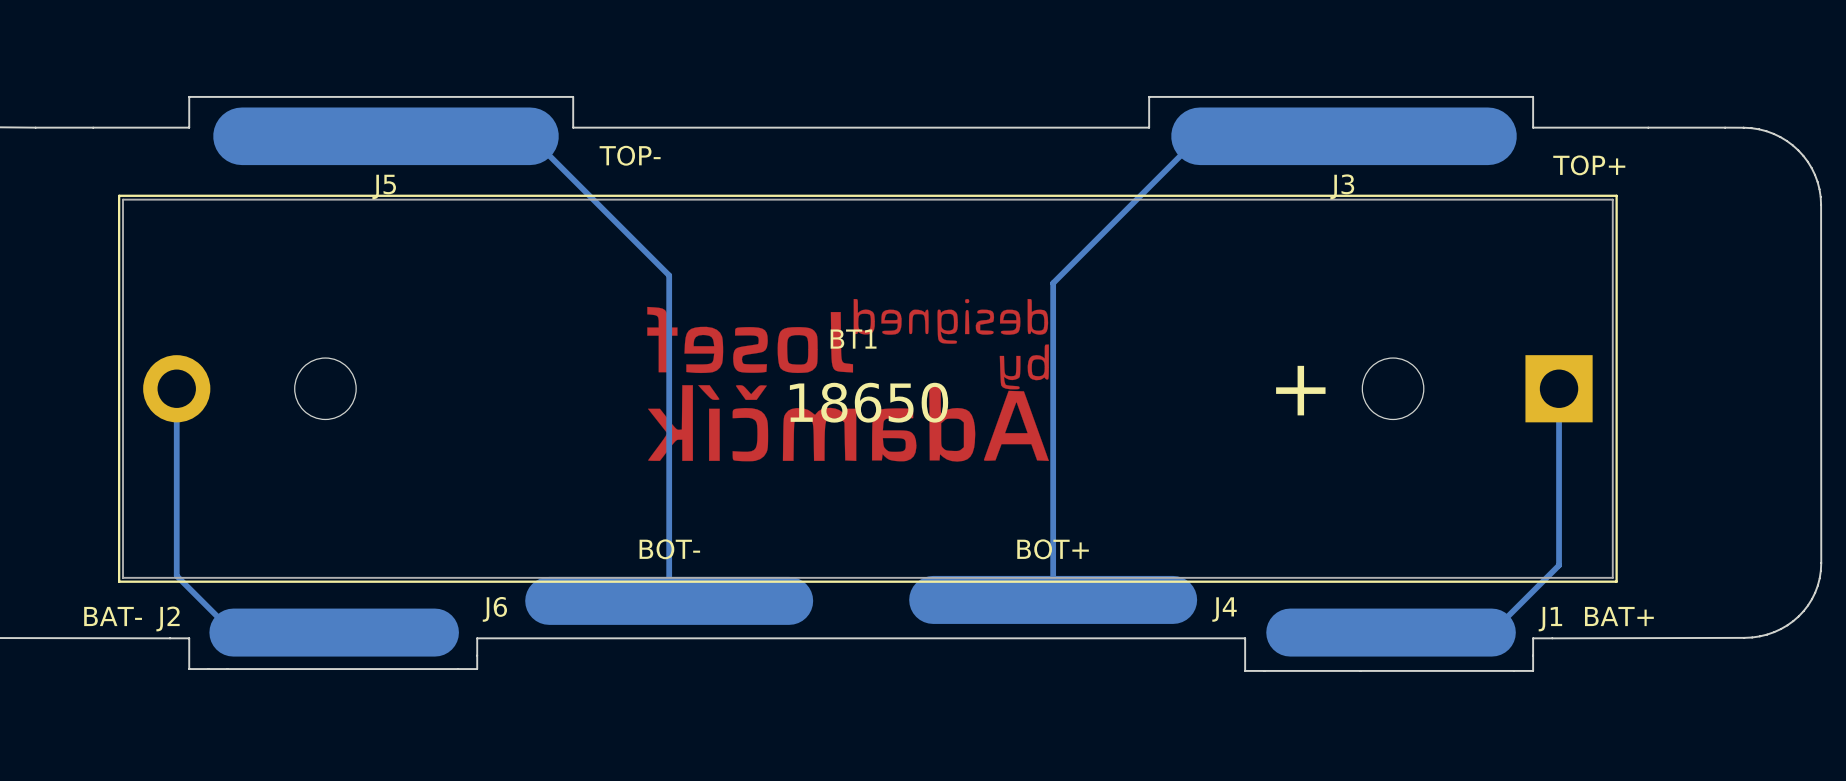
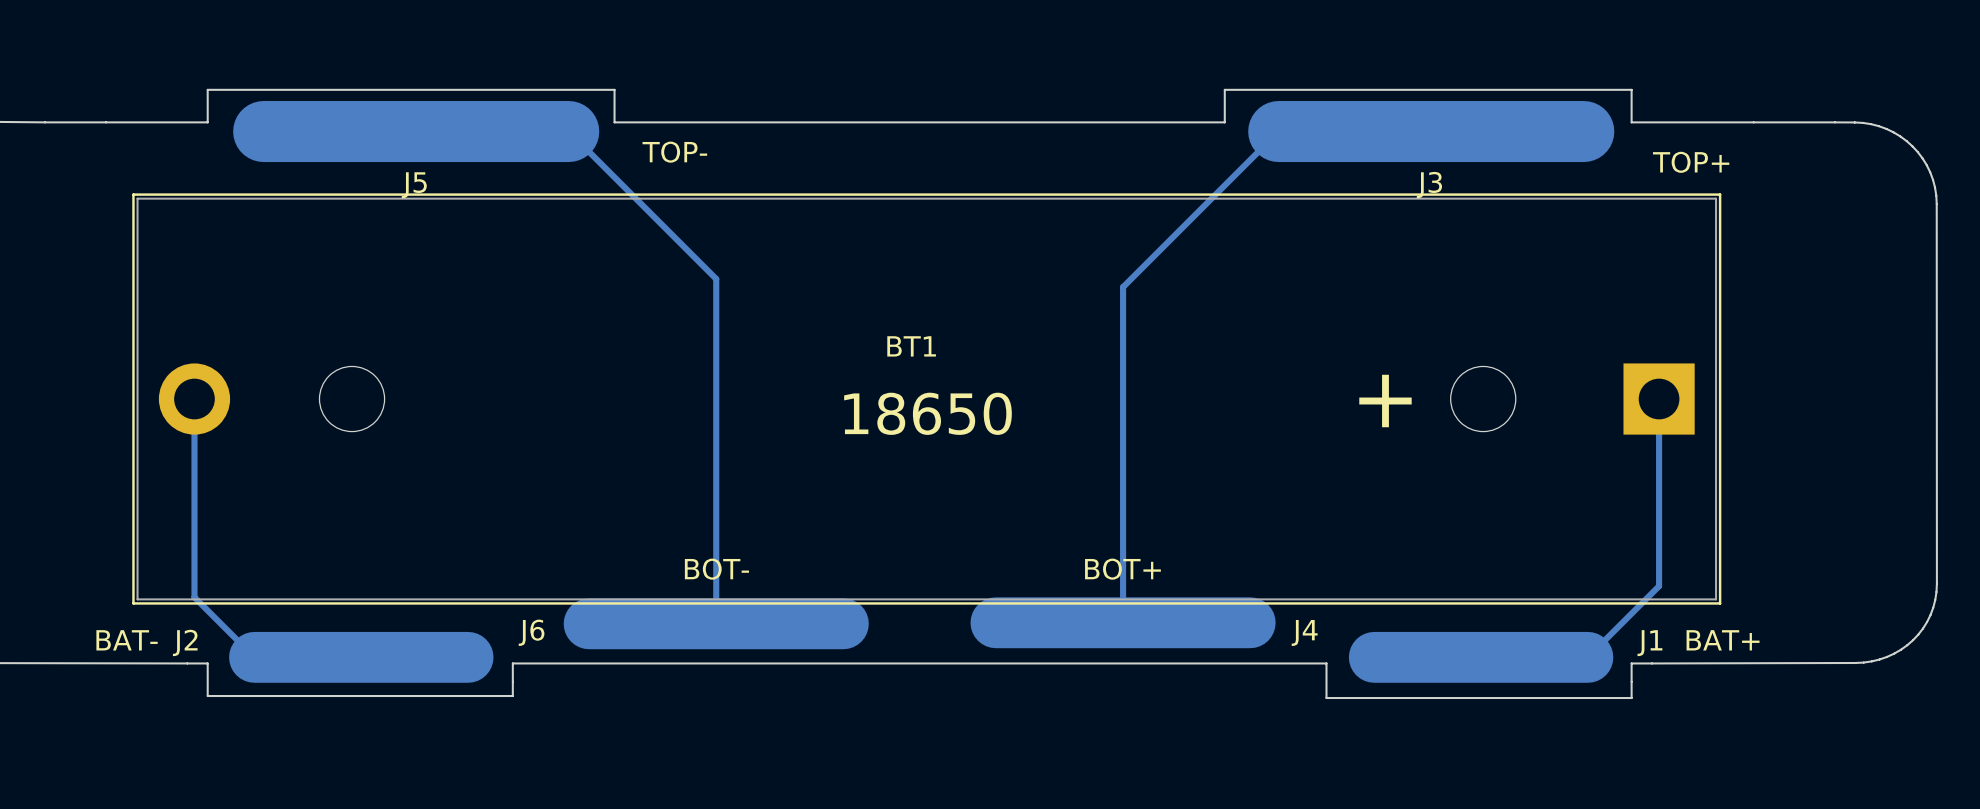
drawing: [647, 298, 1049, 462] -> none

